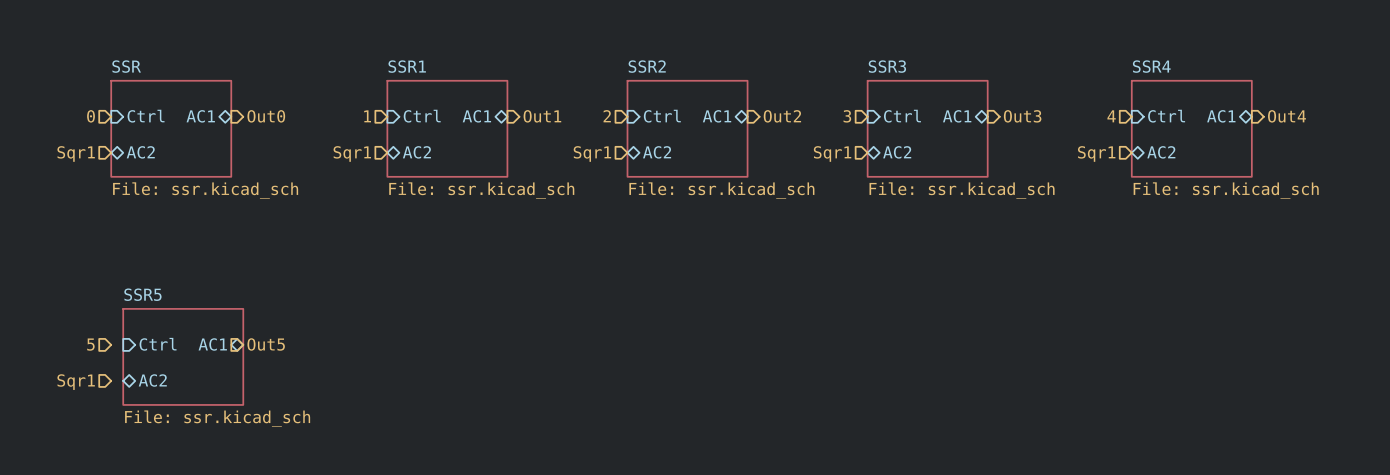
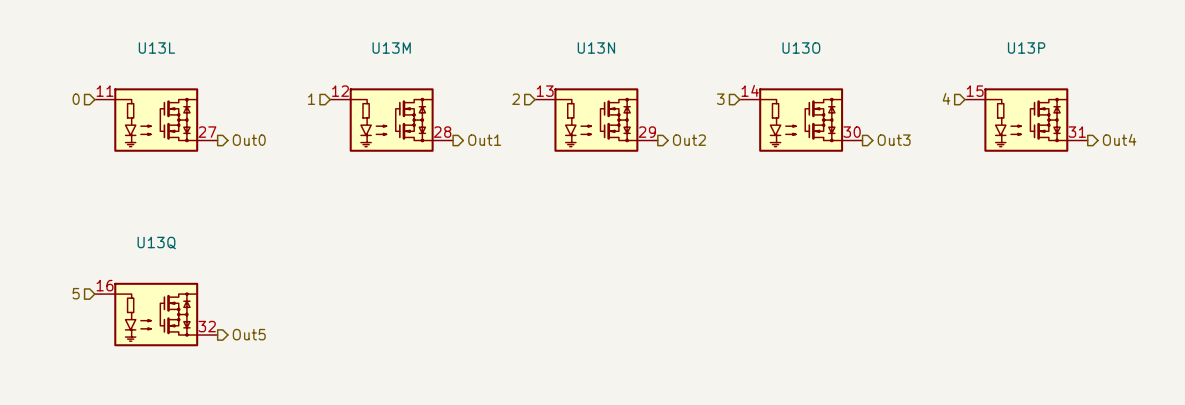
sheet pin: Ctrl (146, 116) -> none
sheet pin: AC1 (200, 116) -> none
hierarchical label position: Out0 (266, 116) -> Out0 (249, 140)
sheet pin: Ctrl (422, 116) -> none
sheet pin: AC1 (476, 116) -> none
hierarchical label position: Out1 (542, 116) -> Out1 (484, 140)
sheet pin: Ctrl (662, 116) -> none
sheet pin: AC1 (717, 116) -> none
hierarchical label position: Out2 (782, 116) -> Out2 (689, 140)
sheet pin: Ctrl (902, 116) -> none
sheet pin: AC1 (957, 116) -> none
hierarchical label position: Out3 (1022, 116) -> Out3 (894, 140)
sheet pin: Ctrl (1166, 116) -> none
sheet pin: AC1 (1221, 116) -> none
hierarchical label position: Out4 (1287, 116) -> Out4 (1119, 139)
sheet SSR: File: ssr.kicad_sch (171, 128) -> none
sheet SSR1: File: ssr.kicad_sch (447, 128) -> none
sheet SSR2: File: ssr.kicad_sch (687, 128) -> none
sheet SSR3: File: ssr.kicad_sch (927, 128) -> none
sheet SSR4: File: ssr.kicad_sch (1191, 128) -> none
U13L: none -> (156, 120)
U13M: none -> (391, 120)
U13N: none -> (596, 120)
U13O: none -> (801, 120)
U13P: none -> (1026, 120)
sheet pin: AC2 (140, 152) -> none
sheet pin: AC2 (416, 152) -> none
sheet pin: AC2 (657, 152) -> none
sheet pin: AC2 (897, 152) -> none
sheet pin: AC2 (1161, 152) -> none
hierarchical label: Sqr1 (76, 153) -> none
hierarchical label: Sqr1 (352, 153) -> none
hierarchical label: Sqr1 (592, 153) -> none
hierarchical label: Sqr1 (832, 153) -> none
hierarchical label: Sqr1 (1096, 153) -> none
sheet pin: Ctrl (158, 344) -> none
sheet pin: AC1 (212, 344) -> none
hierarchical label position: Out5 (266, 344) -> Out5 (249, 334)
sheet SSR5: File: ssr.kicad_sch (183, 356) -> none
U13Q: none -> (156, 314)
sheet pin: AC2 (152, 380) -> none
hierarchical label: Sqr1 (76, 382) -> none

